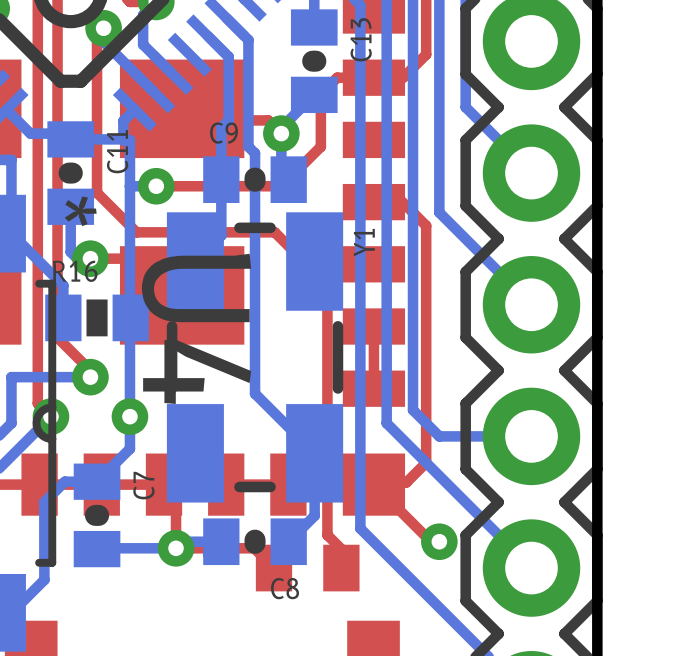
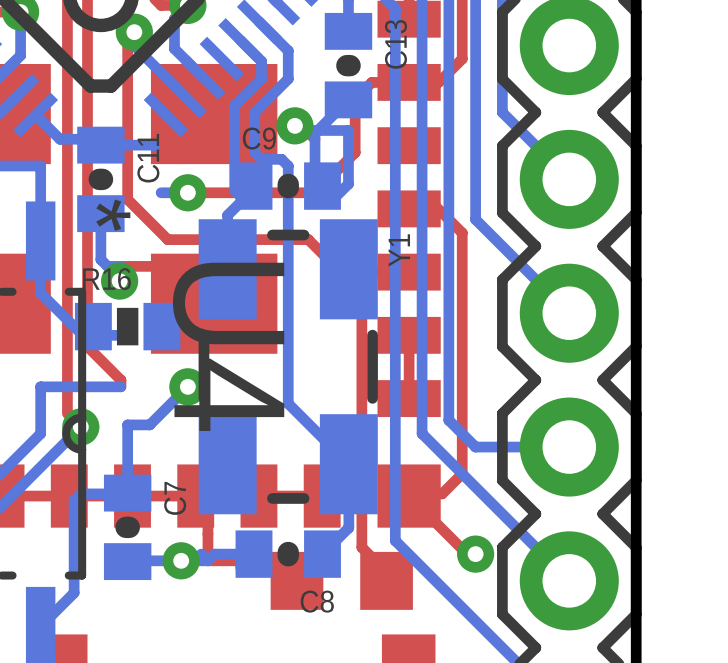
bottom track: (248, 40) (248, 146) (255, 153) (255, 159) -> (281, 44) (288, 50) (288, 79) (254, 112) (254, 152) (261, 159) (281, 159) (288, 166)
bottom track: (228, 74) (228, 120) (221, 127) (221, 235) (195, 261) -> (261, 79) (234, 105) (234, 190) (243, 199) (227, 215) (227, 289)
bottom track: (134, 109) (123, 121) (123, 140) (129, 140) (129, 448) (97, 481) (64, 481) (44, 502) -> (187, 386) (149, 424) (127, 424) (127, 489) (123, 493) (80, 493) (74, 500) (74, 513)
bottom track: none -> (294, 125) (299, 130) (348, 130) (348, 184) (333, 199)
via position: (281, 133) -> (294, 125)
bottom track: (11, 233) (63, 285) (63, 317) -> (40, 240) (40, 293) (82, 335) (127, 335)
via position: (90, 258) -> (119, 281)
via: (90, 377) -> none
via: none -> (187, 386)
via: (129, 416) -> none
part footprint: [255, 544, 360, 592] -> [270, 551, 413, 610]
via position: (176, 548) -> (181, 560)

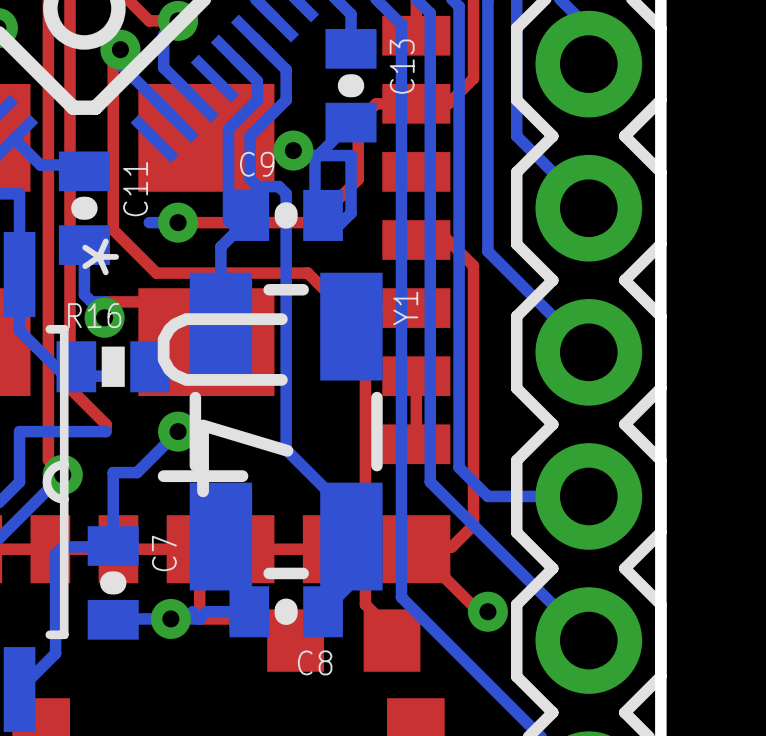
bottom track: (100, 145) (154, 145) -> none
Y1 position: (288, 366) -> (286, 431)

